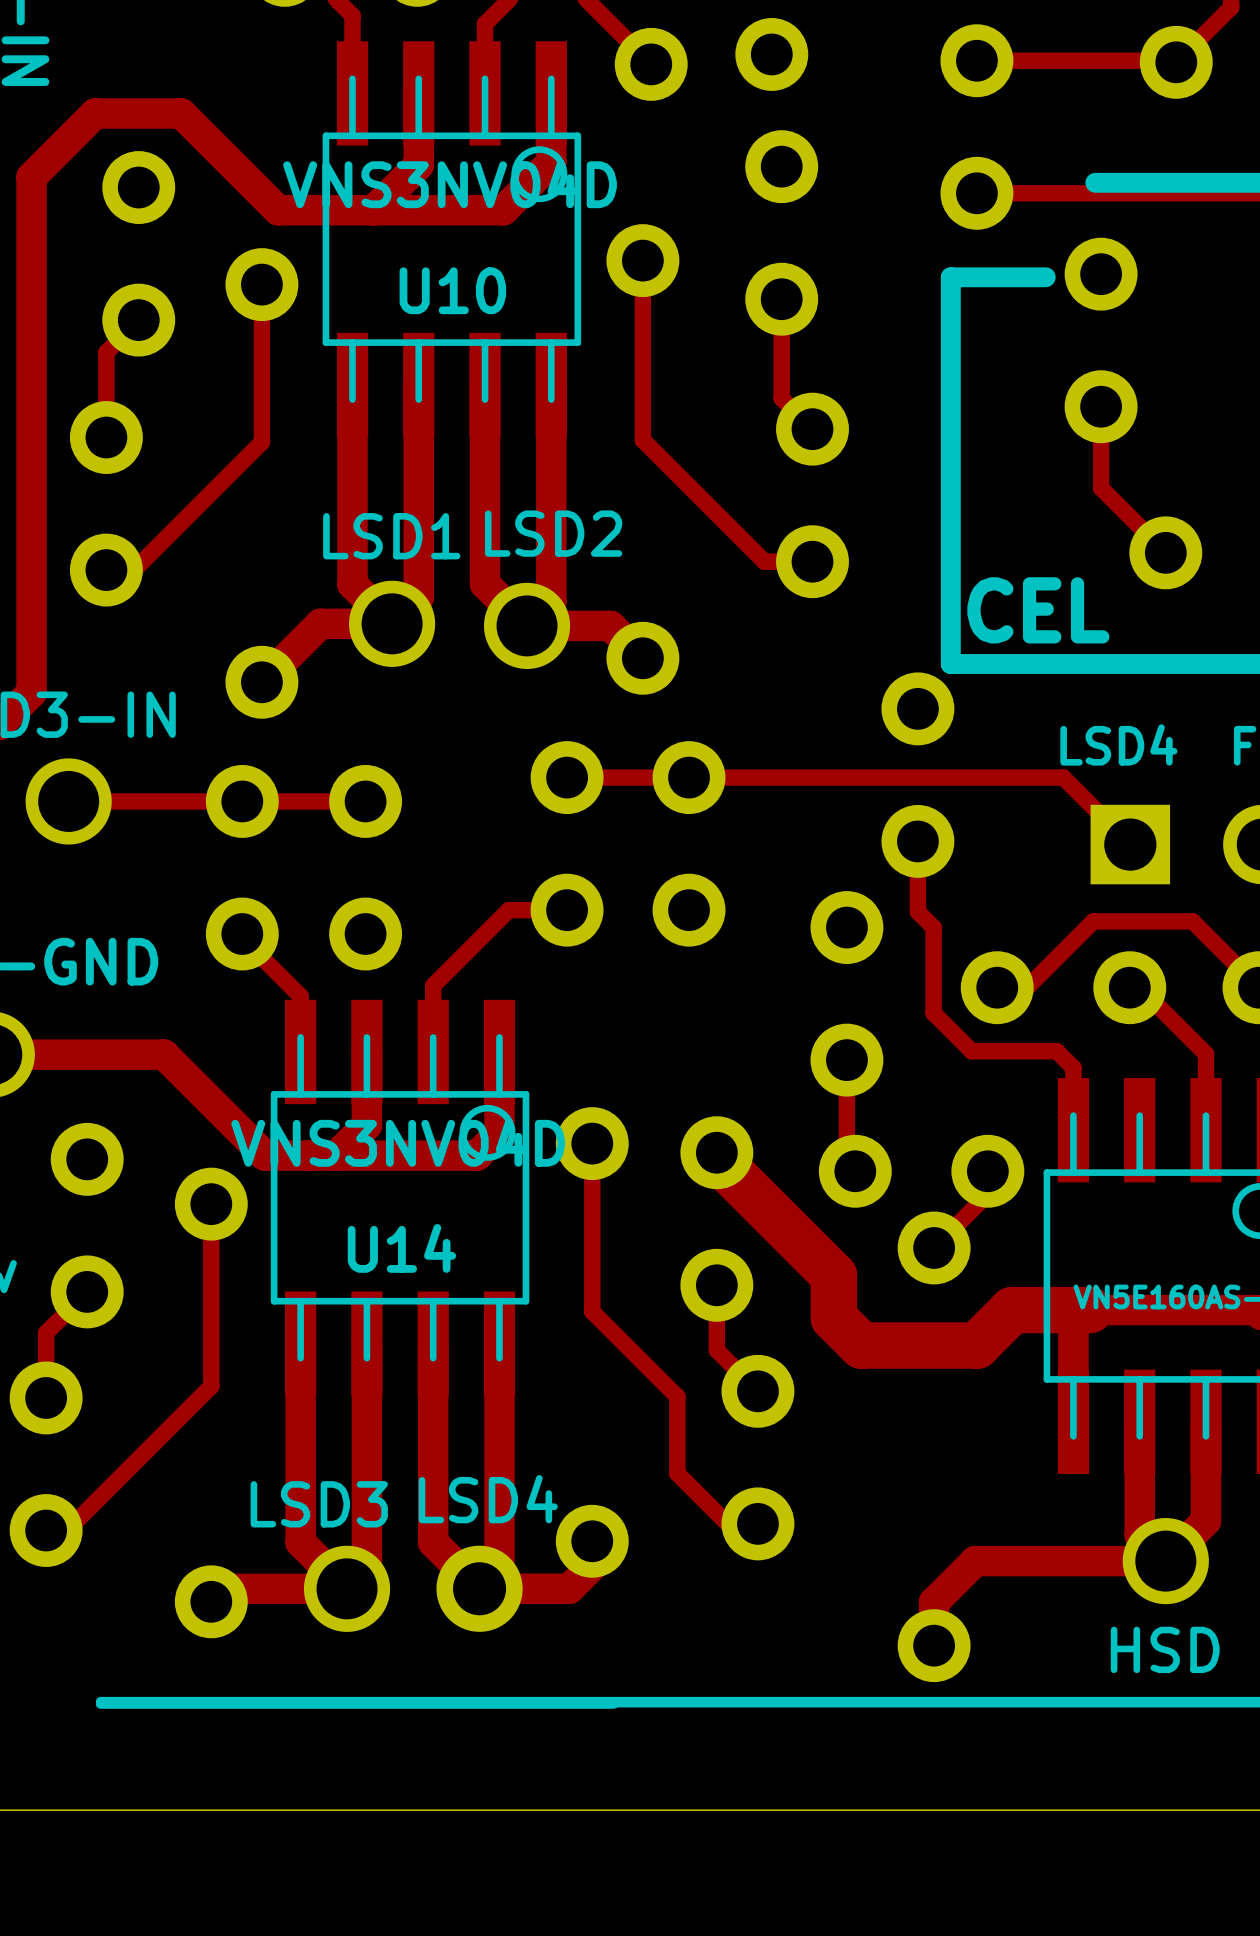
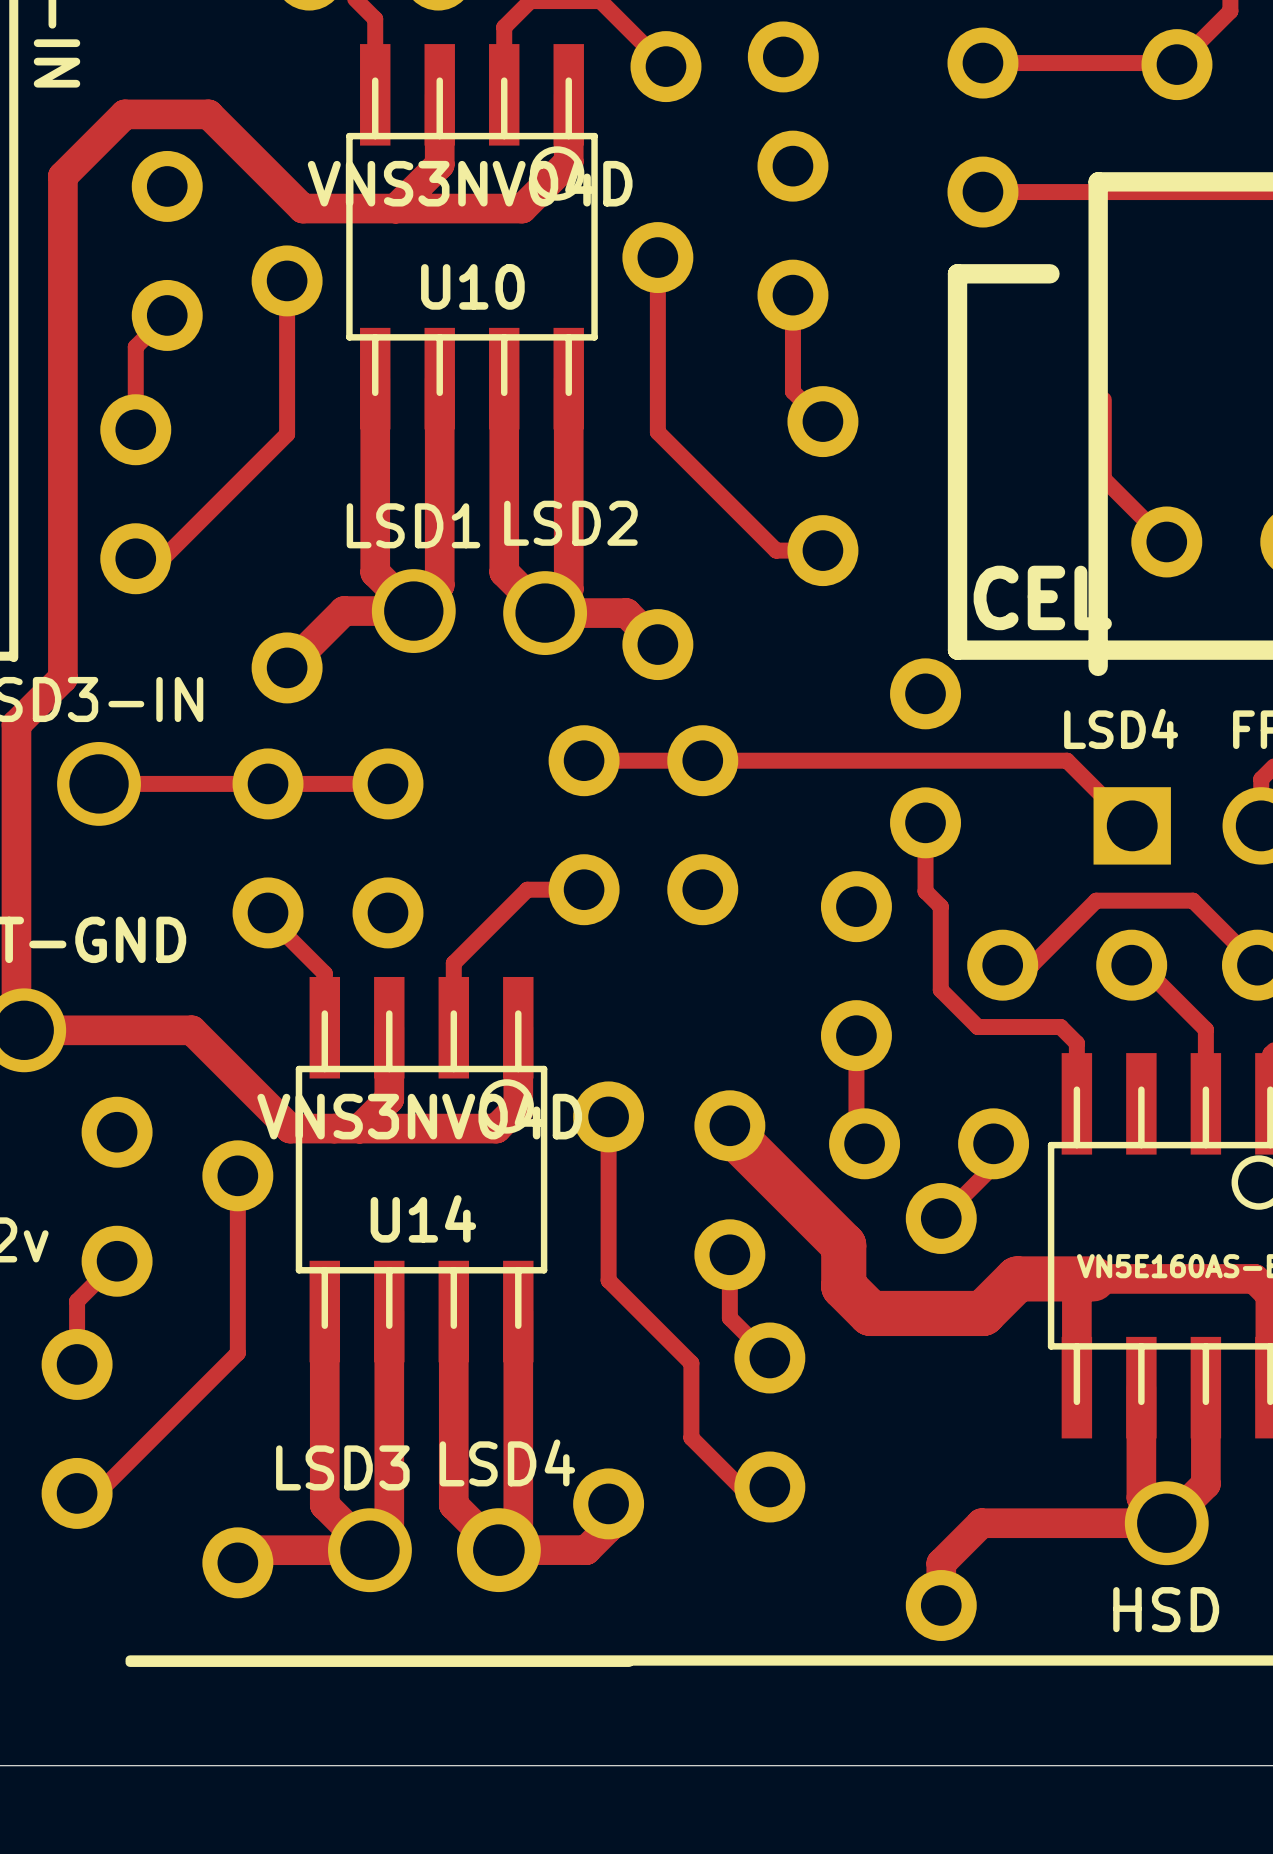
line: none -> (1098, 181) (1098, 666)
part: (1101, 340) -> none

